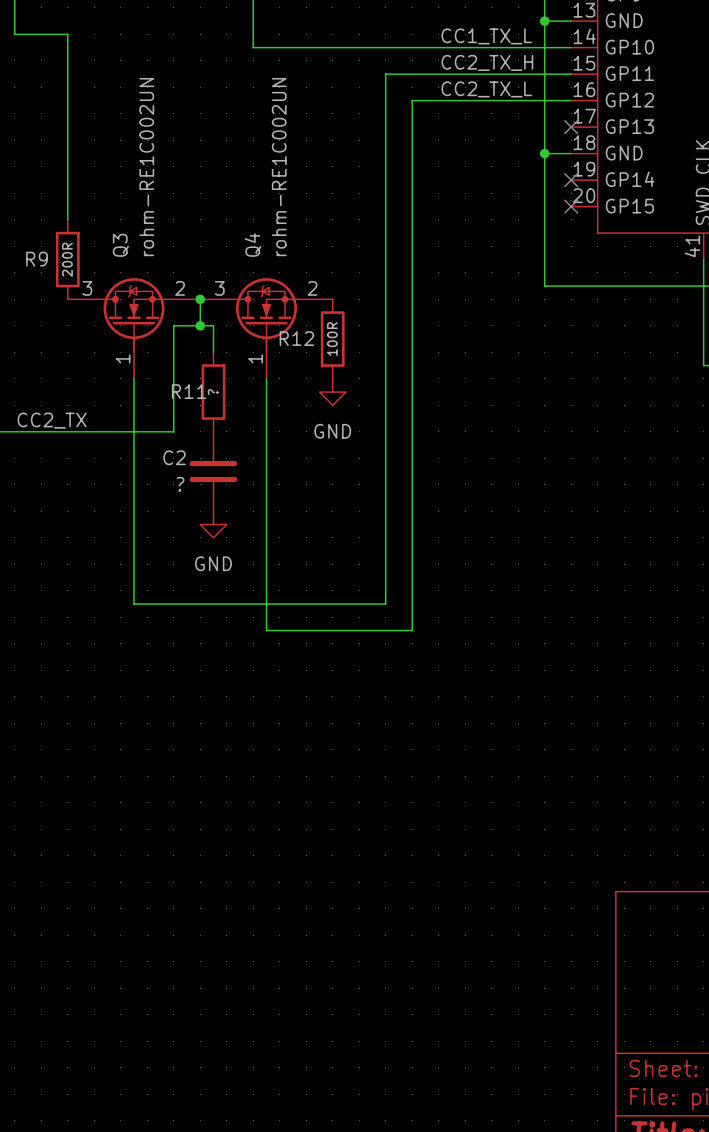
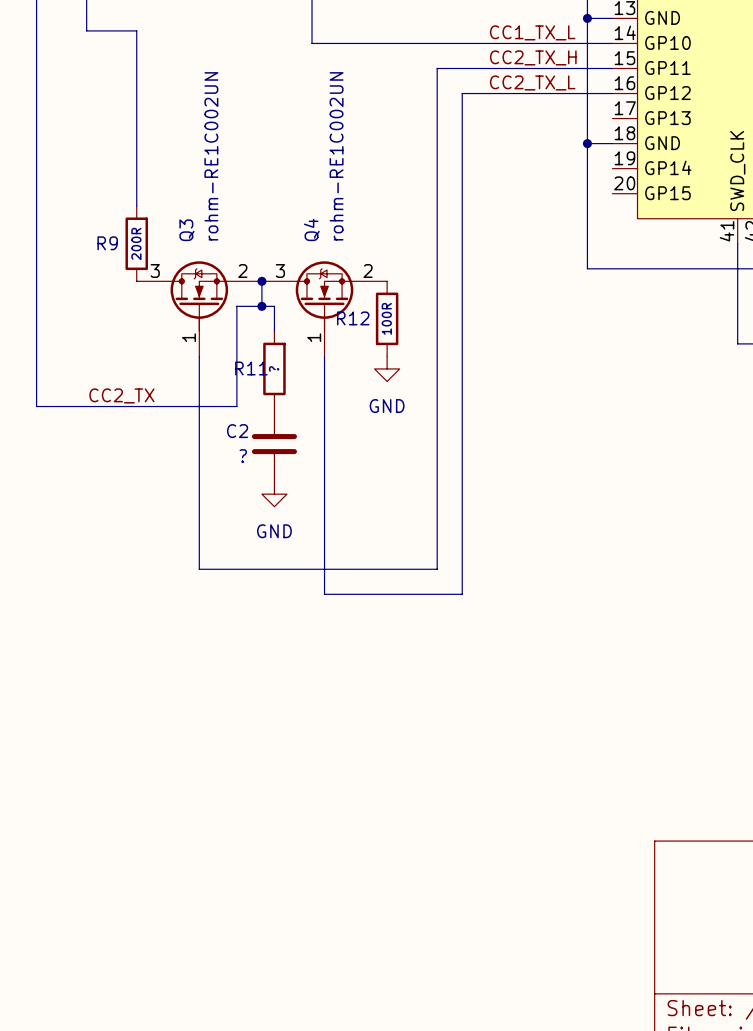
no-connect mark: (571, 127) -> none
no-connect mark: (571, 180) -> none
no-connect mark: (571, 206) -> none

